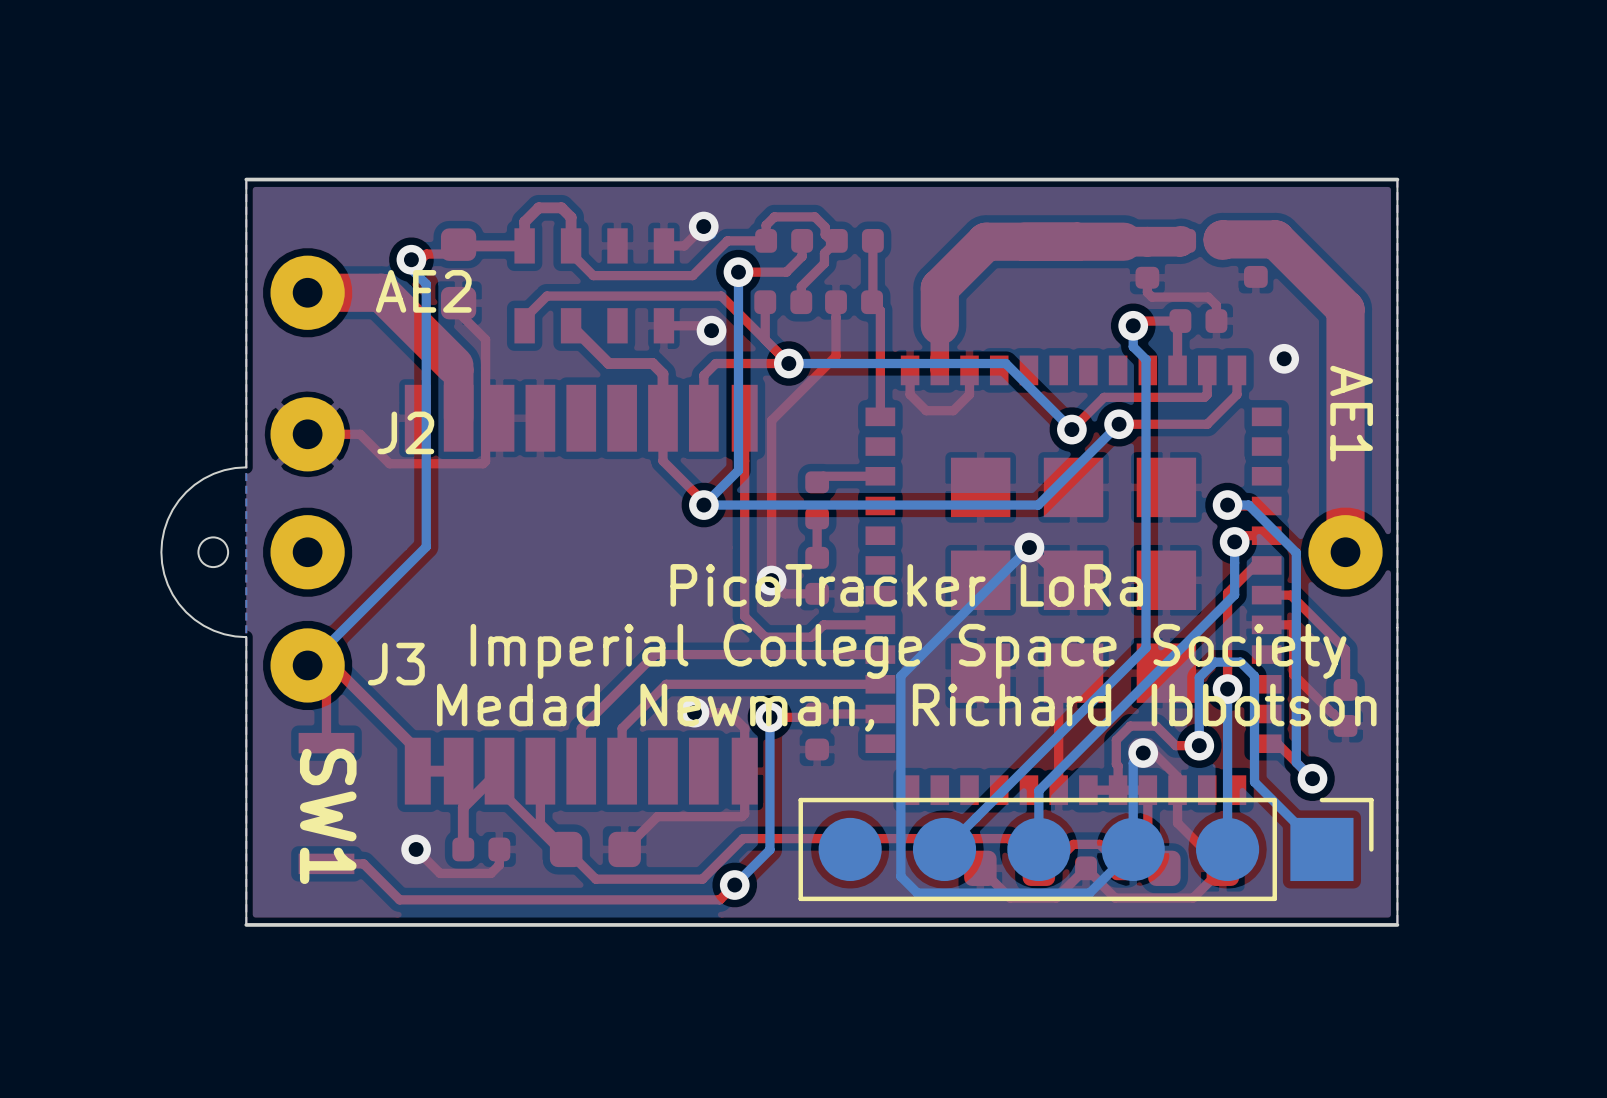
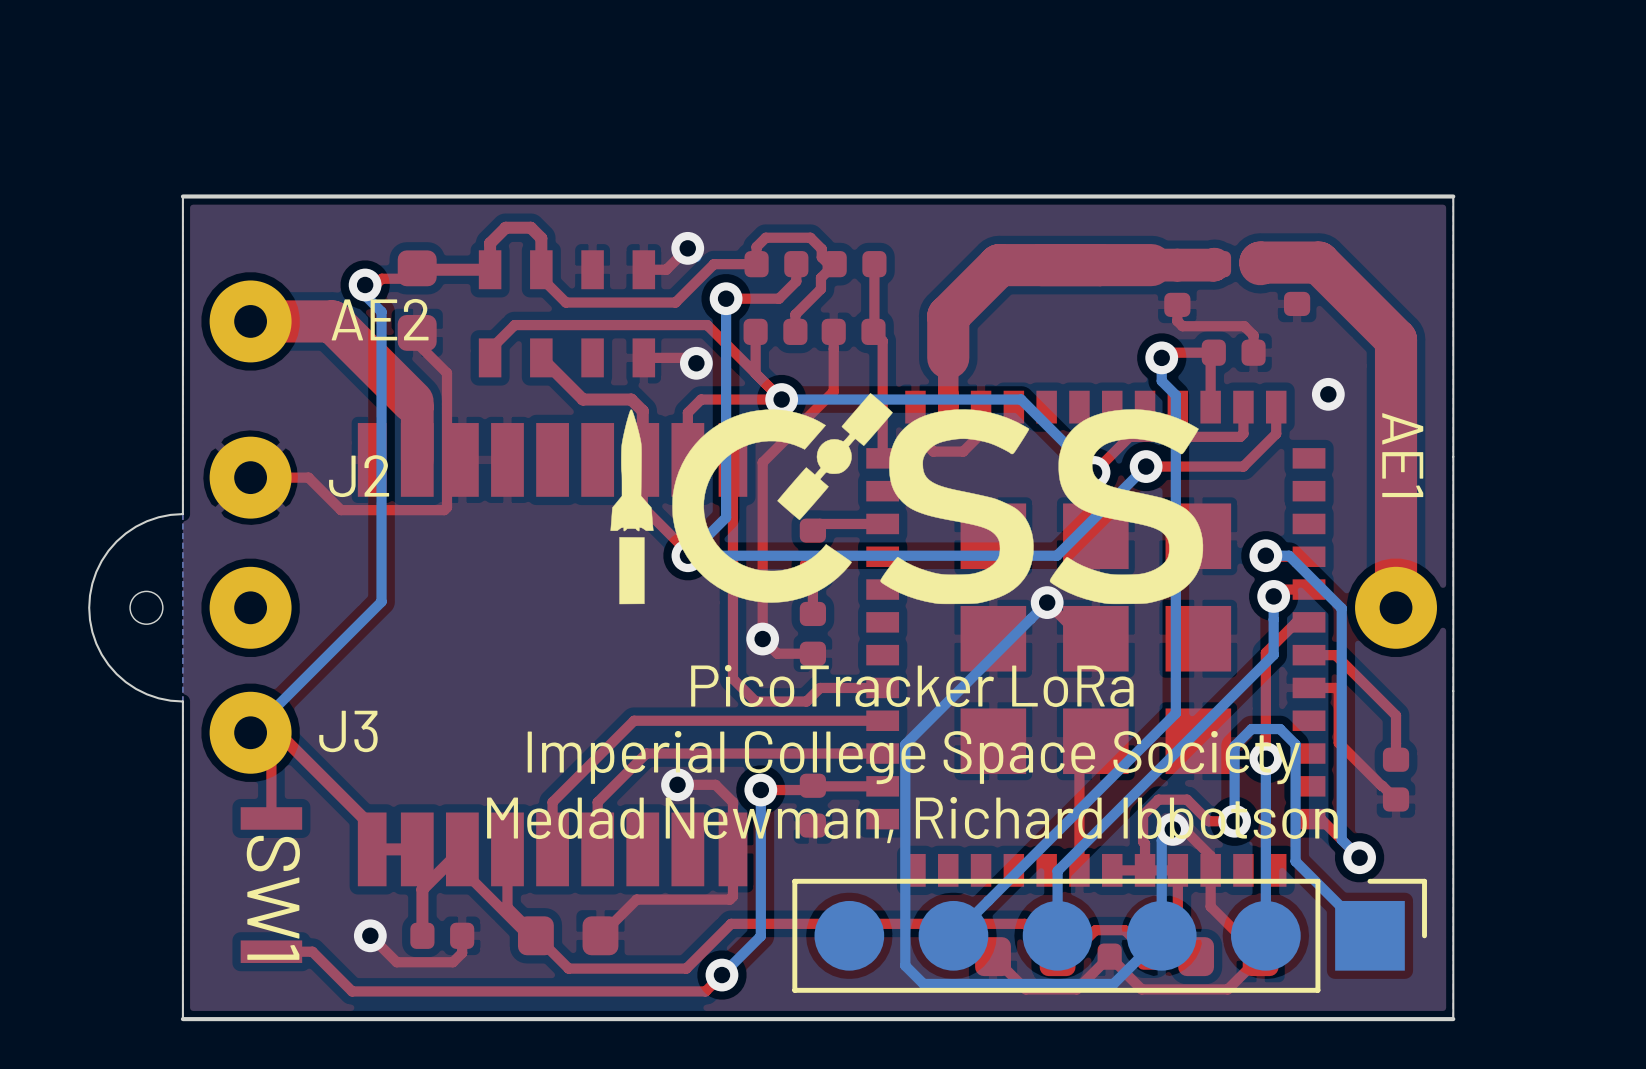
drawing: none -> [610, 393, 1204, 605]
text position: PicoTracker LoRa (906, 585) -> PicoTracker LoRa (912, 686)
text position: Imperial College Space Society (908, 651) -> Imperial College Space Society (913, 757)
text position: Medad Newman, Richard Ibbotson (906, 707) -> Medad Newman, Richard Ibbotson (912, 820)

